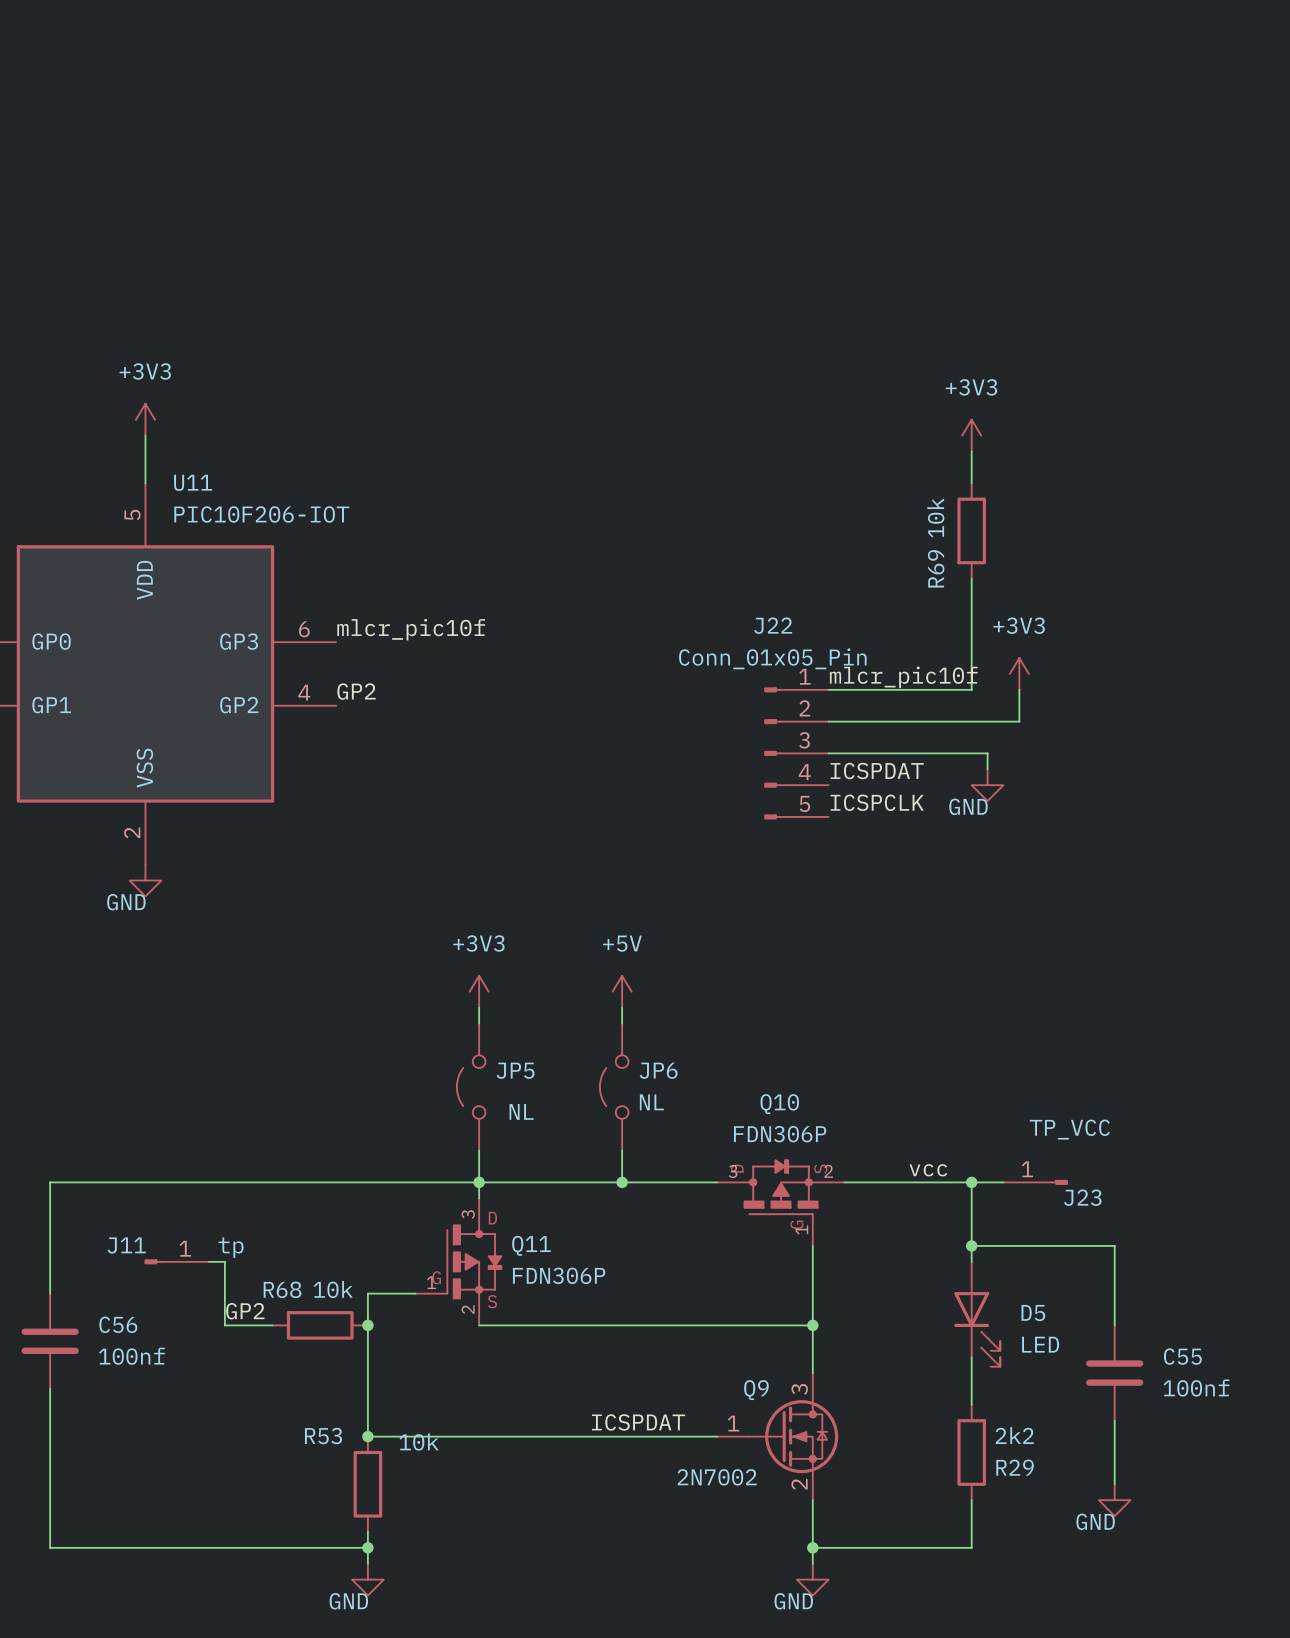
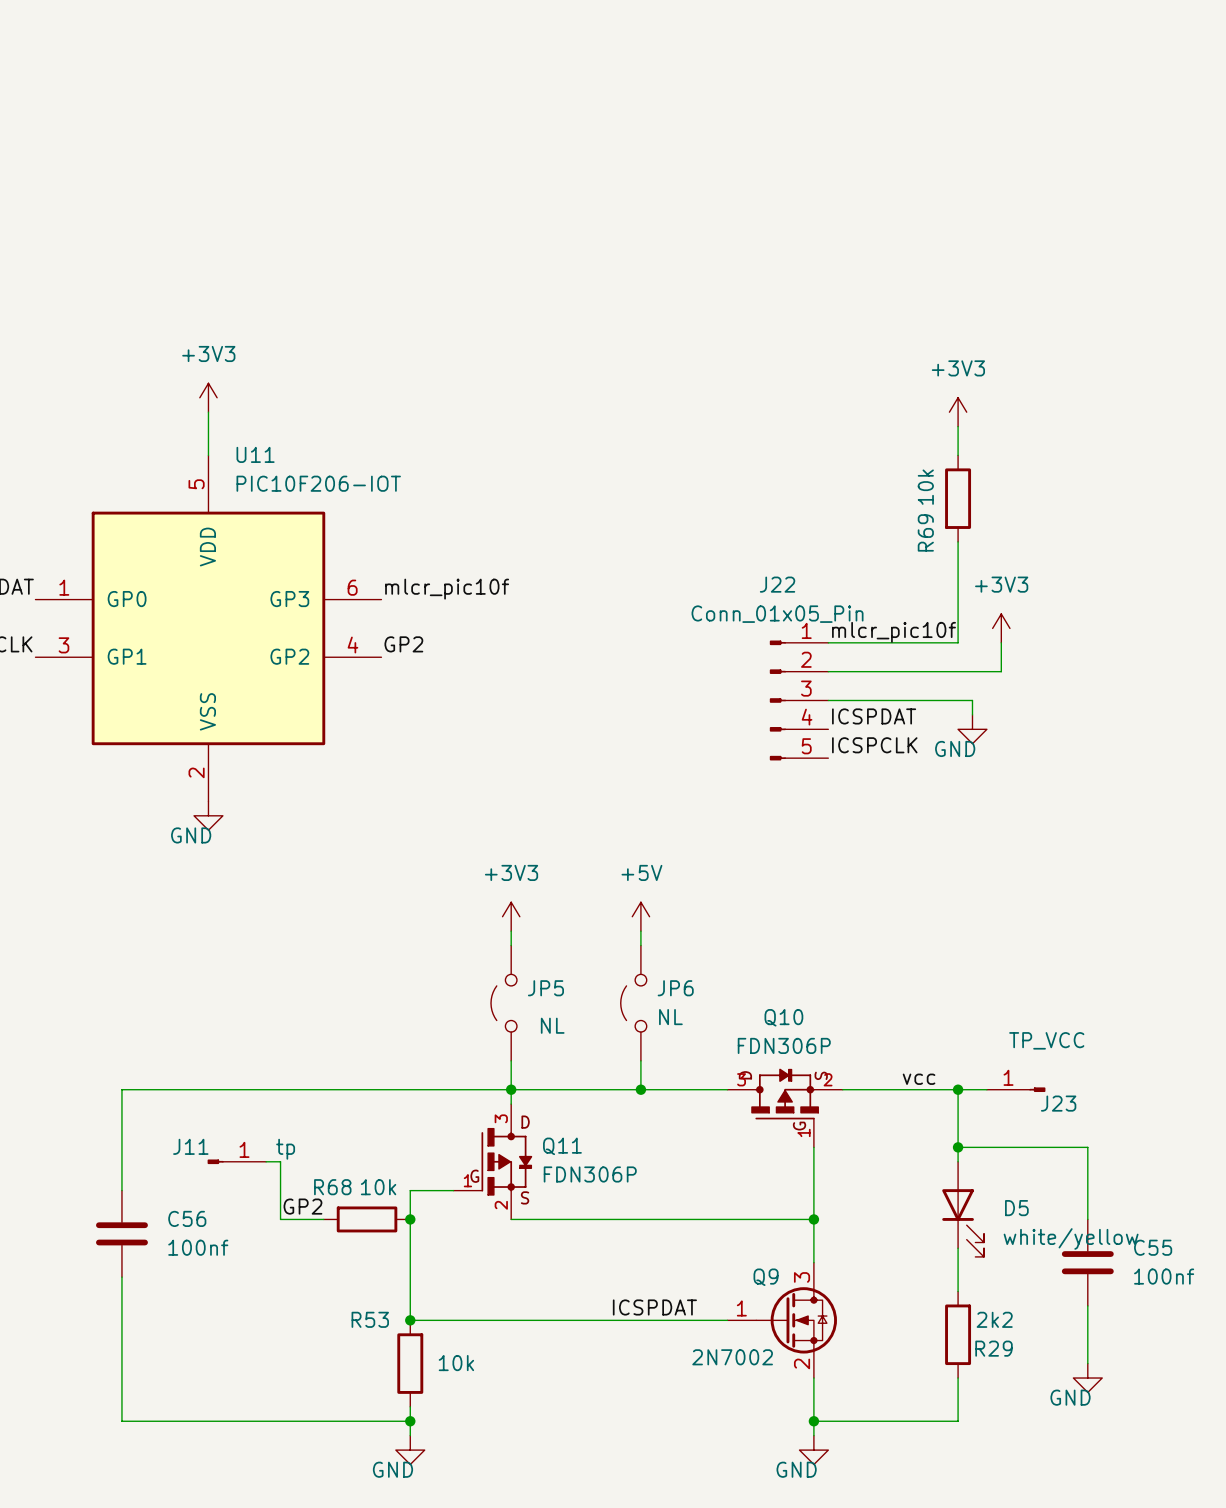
D5 value: LED (1040, 1344) -> white/yellow (1071, 1238)
R53 value position: 10k (419, 1442) -> 10k (456, 1363)

